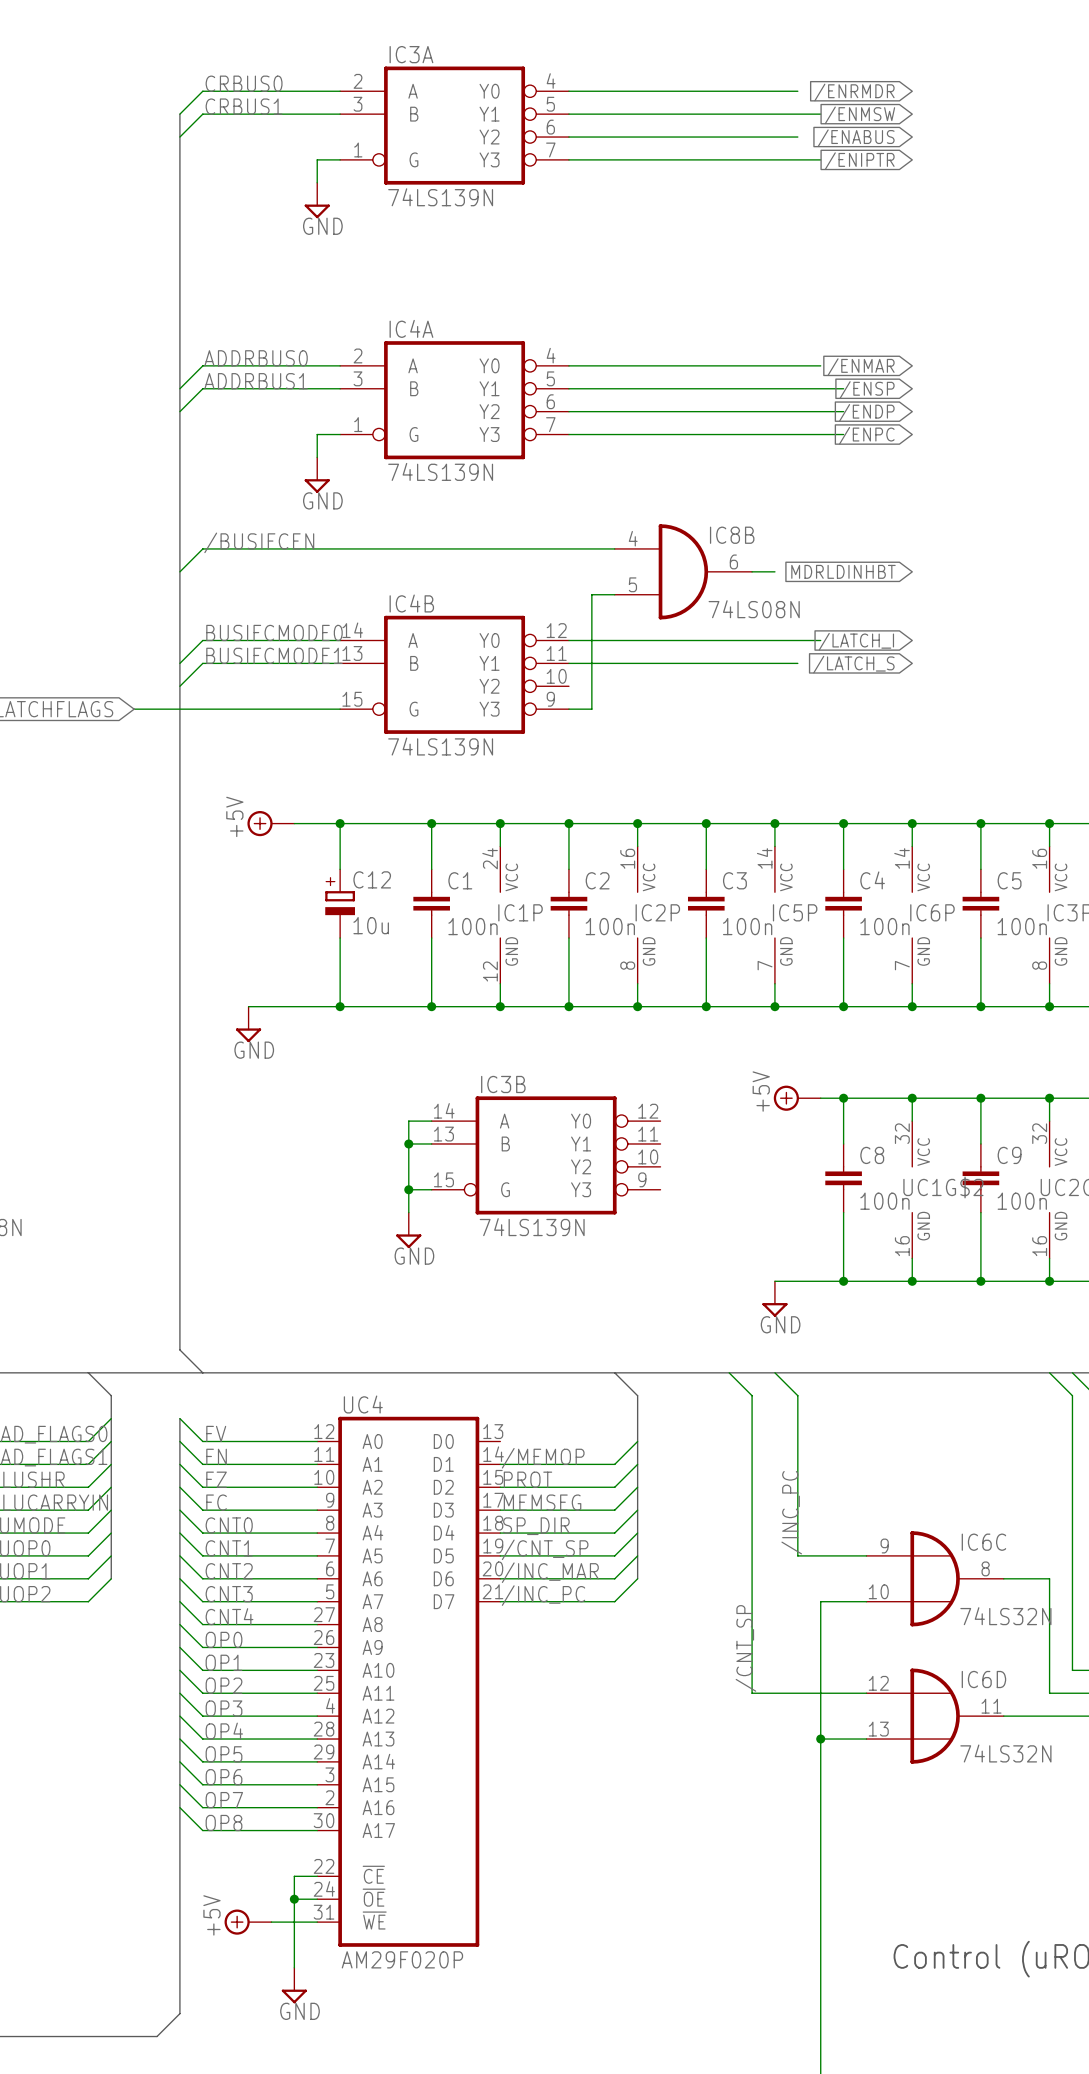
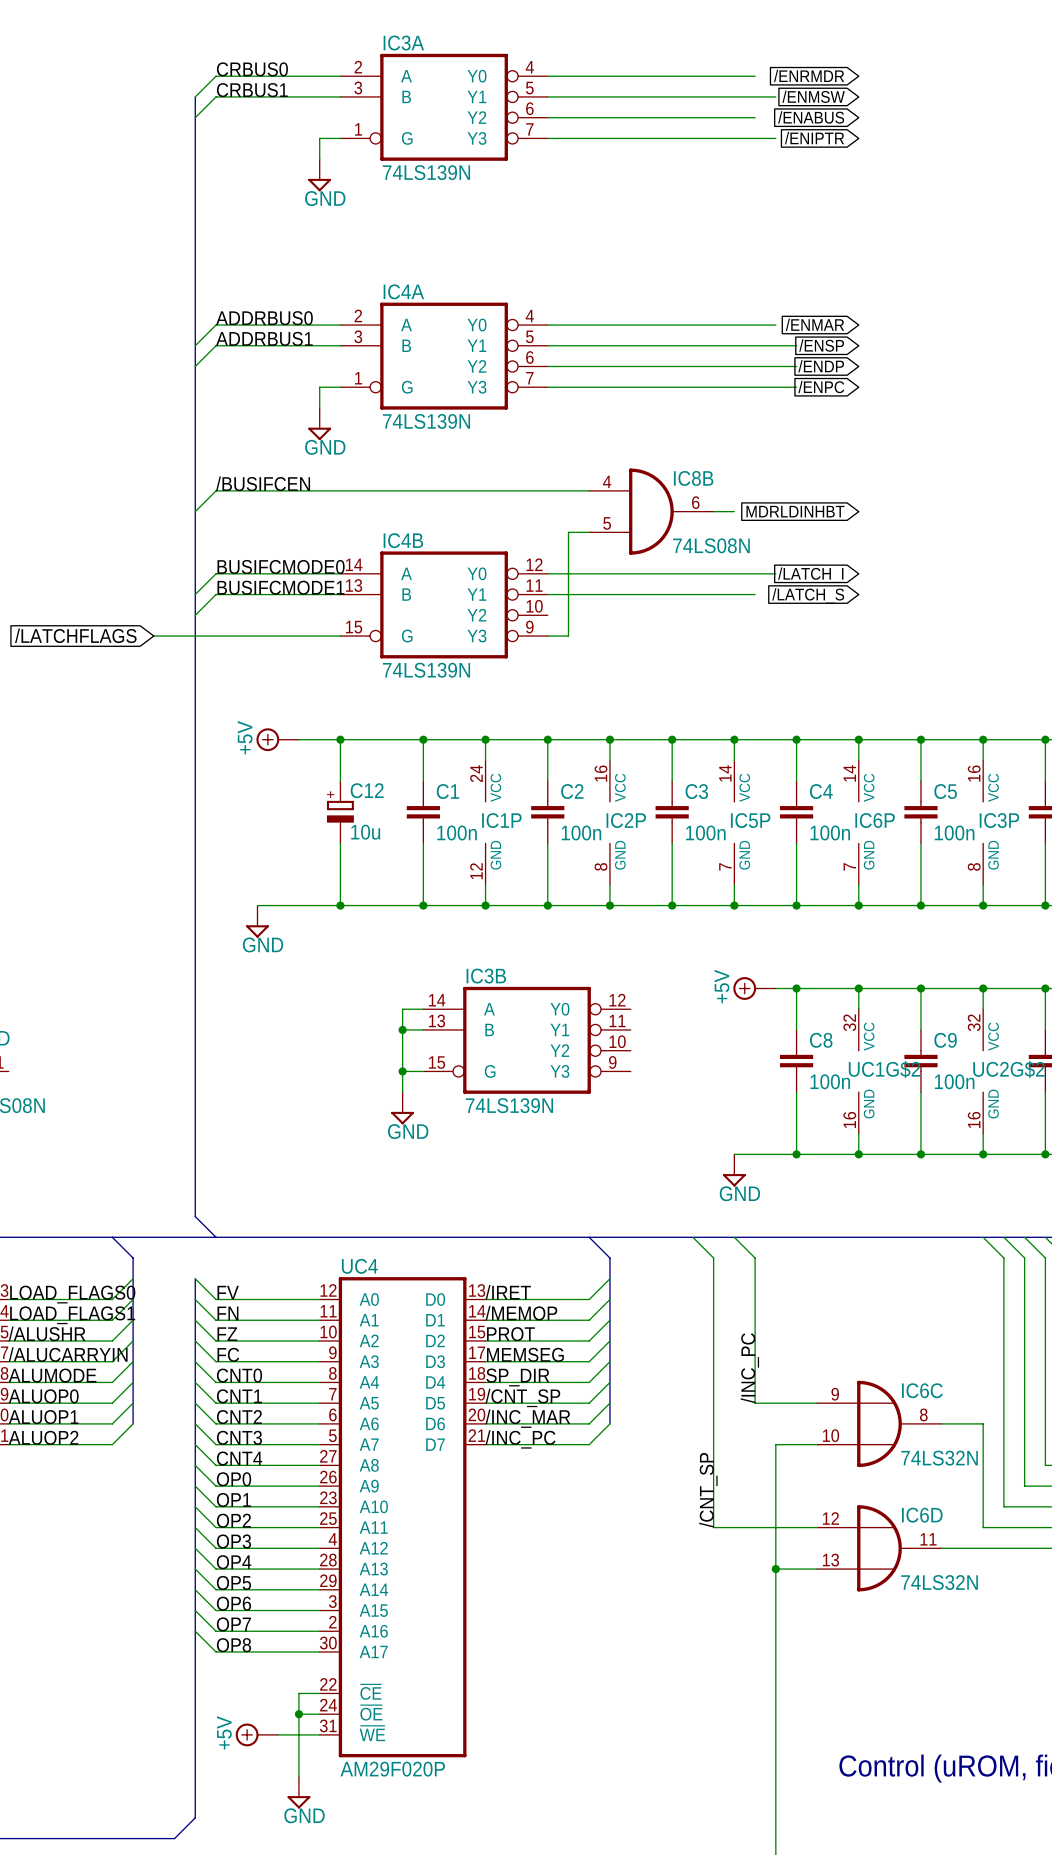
wire: none -> (609, 1278) (589, 1299) (485, 1299)
label: none -> /IRET (508, 1292)

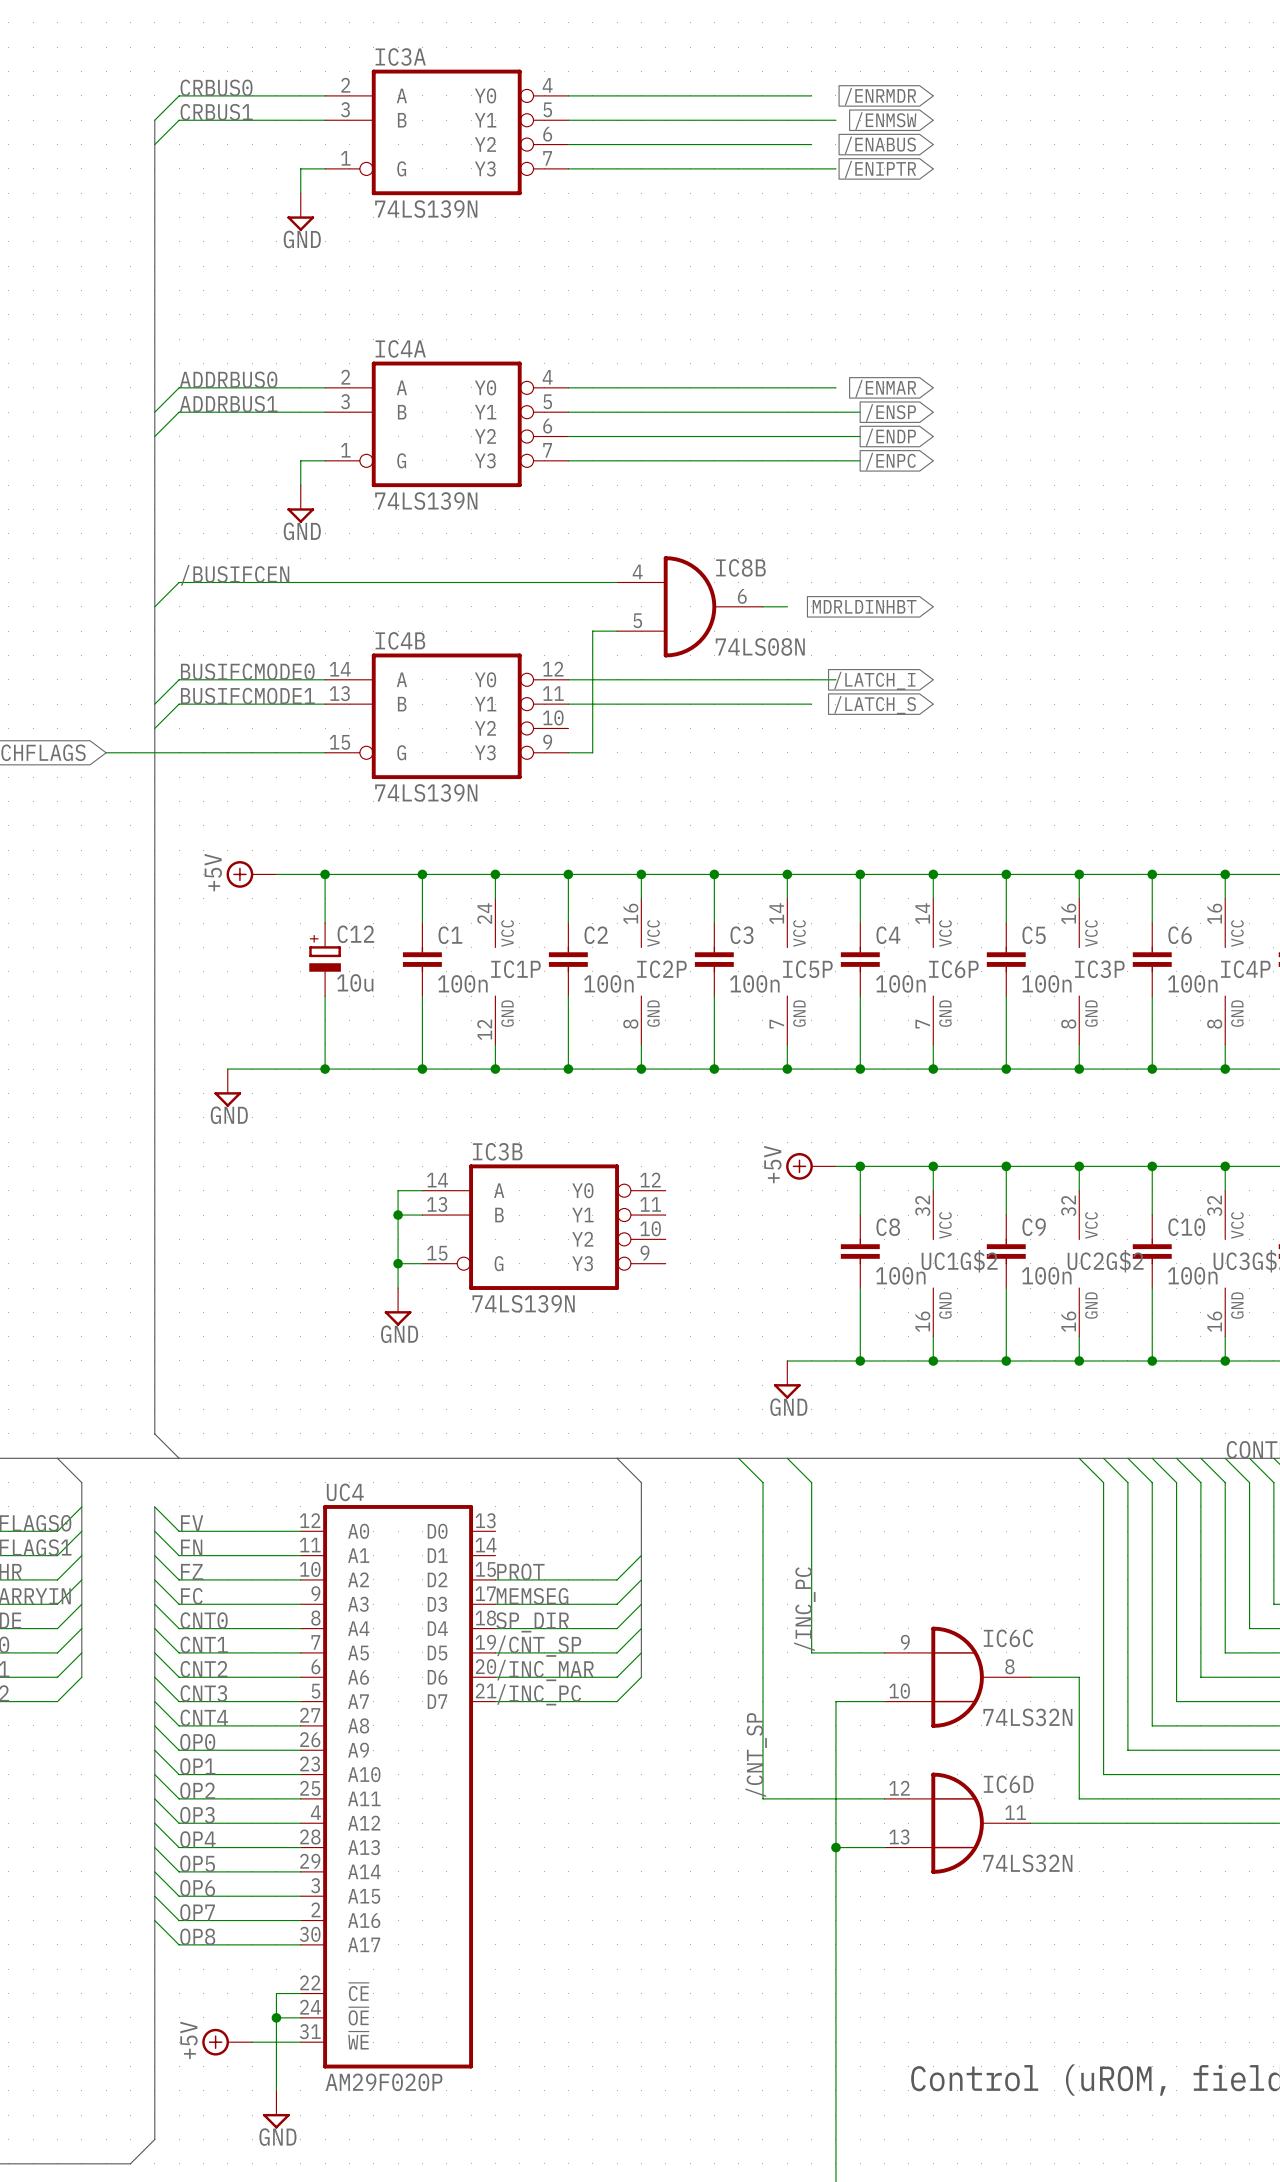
wire: (609, 1278) (589, 1299) (485, 1299) -> none
label: /IRET (508, 1292) -> none
wire: (609, 1299) (589, 1320) (485, 1320) -> none
label: /MEMOP (521, 1313) -> none

